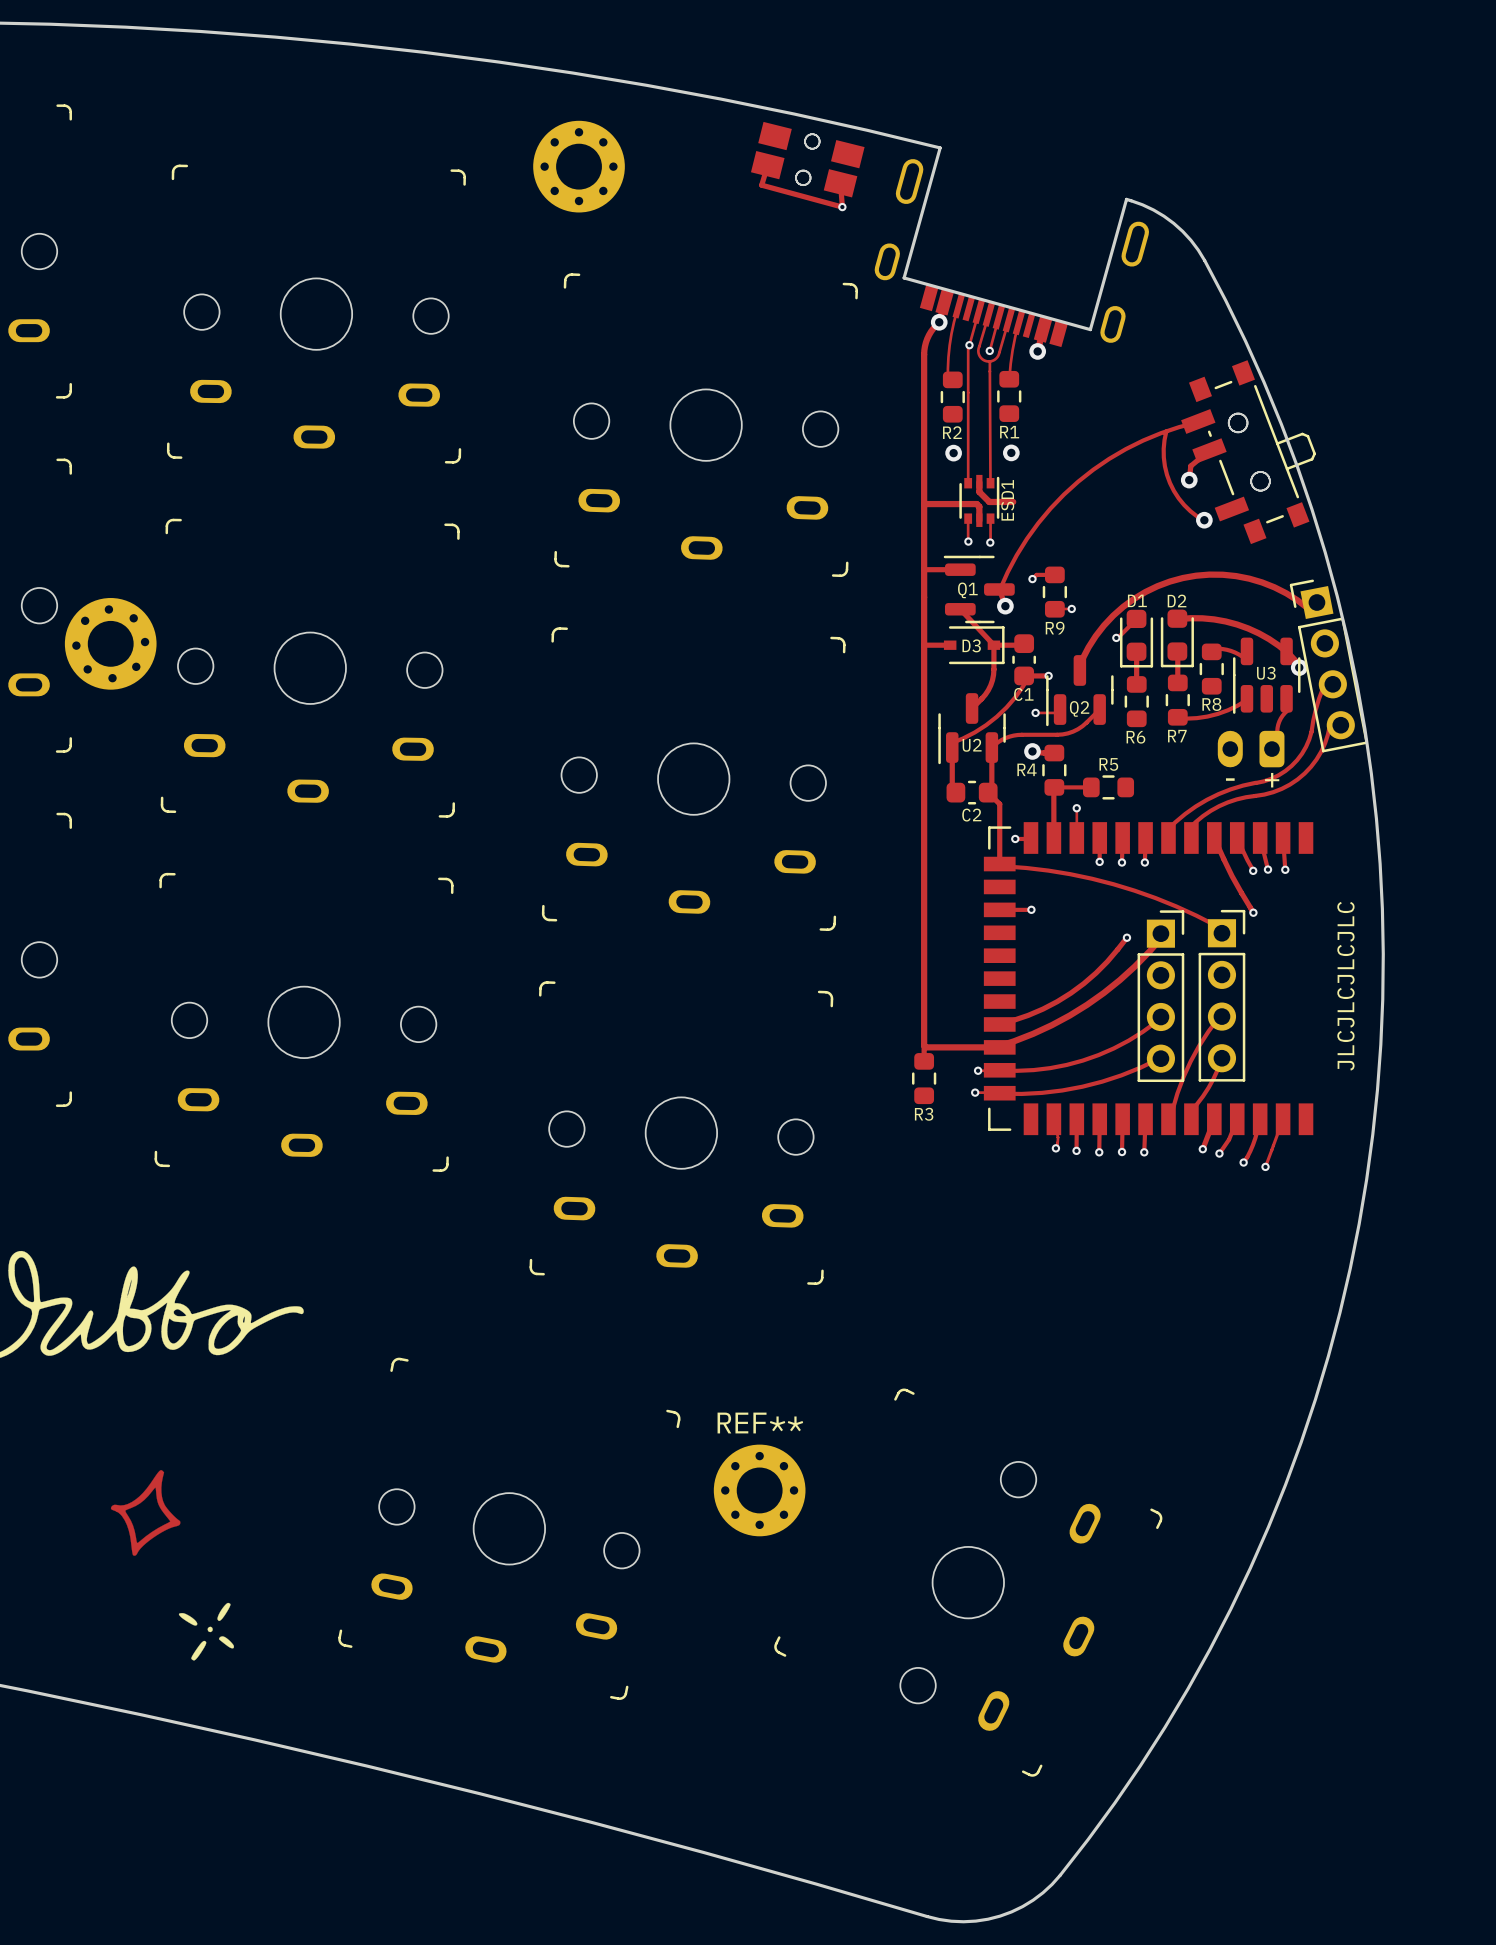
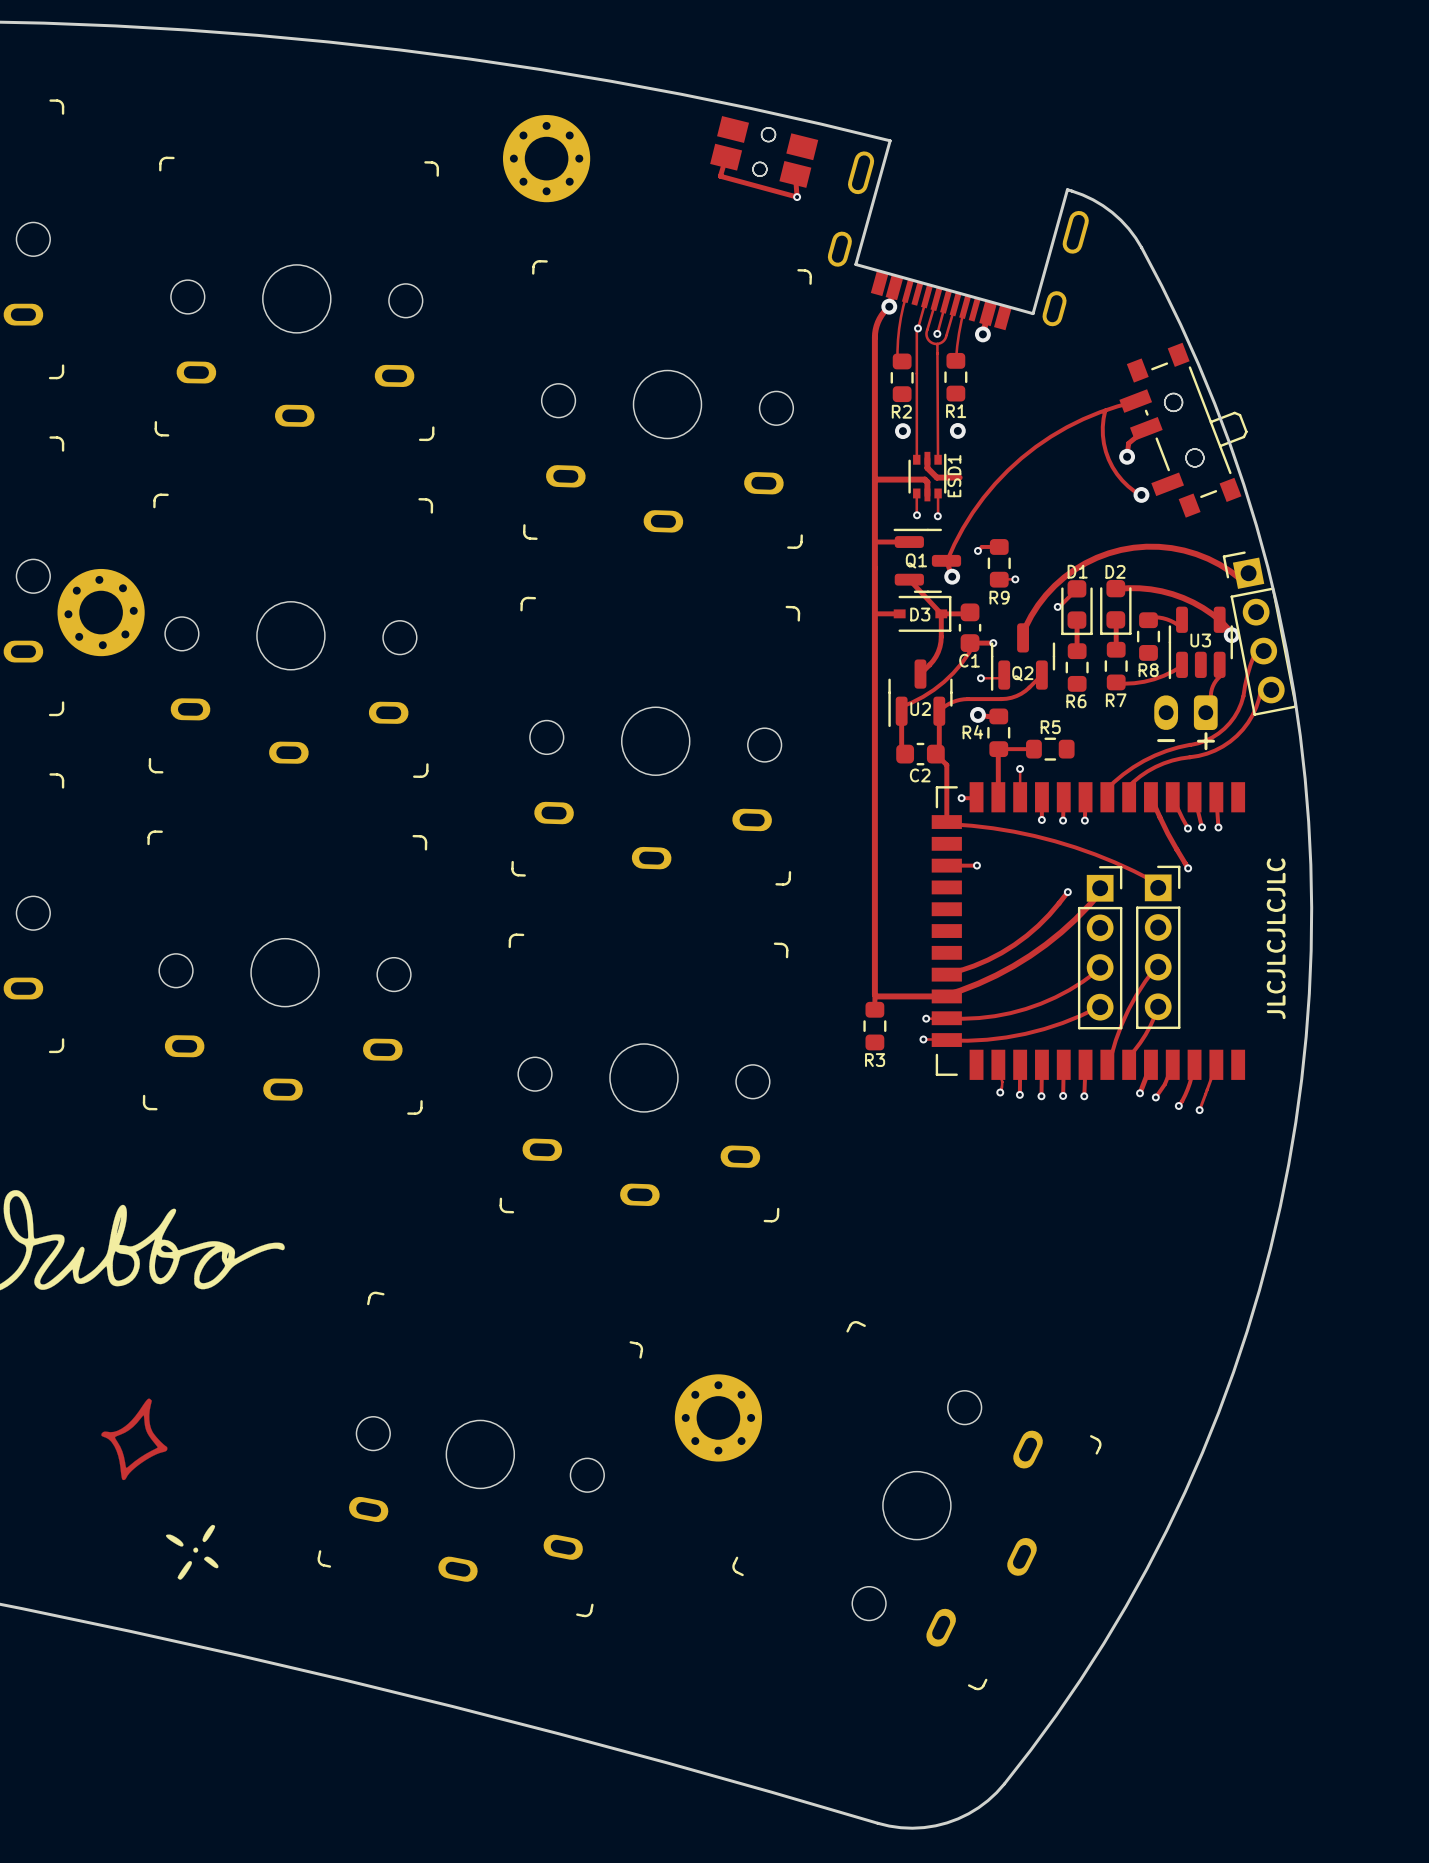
REF** name: REF** (760, 1423) -> none

